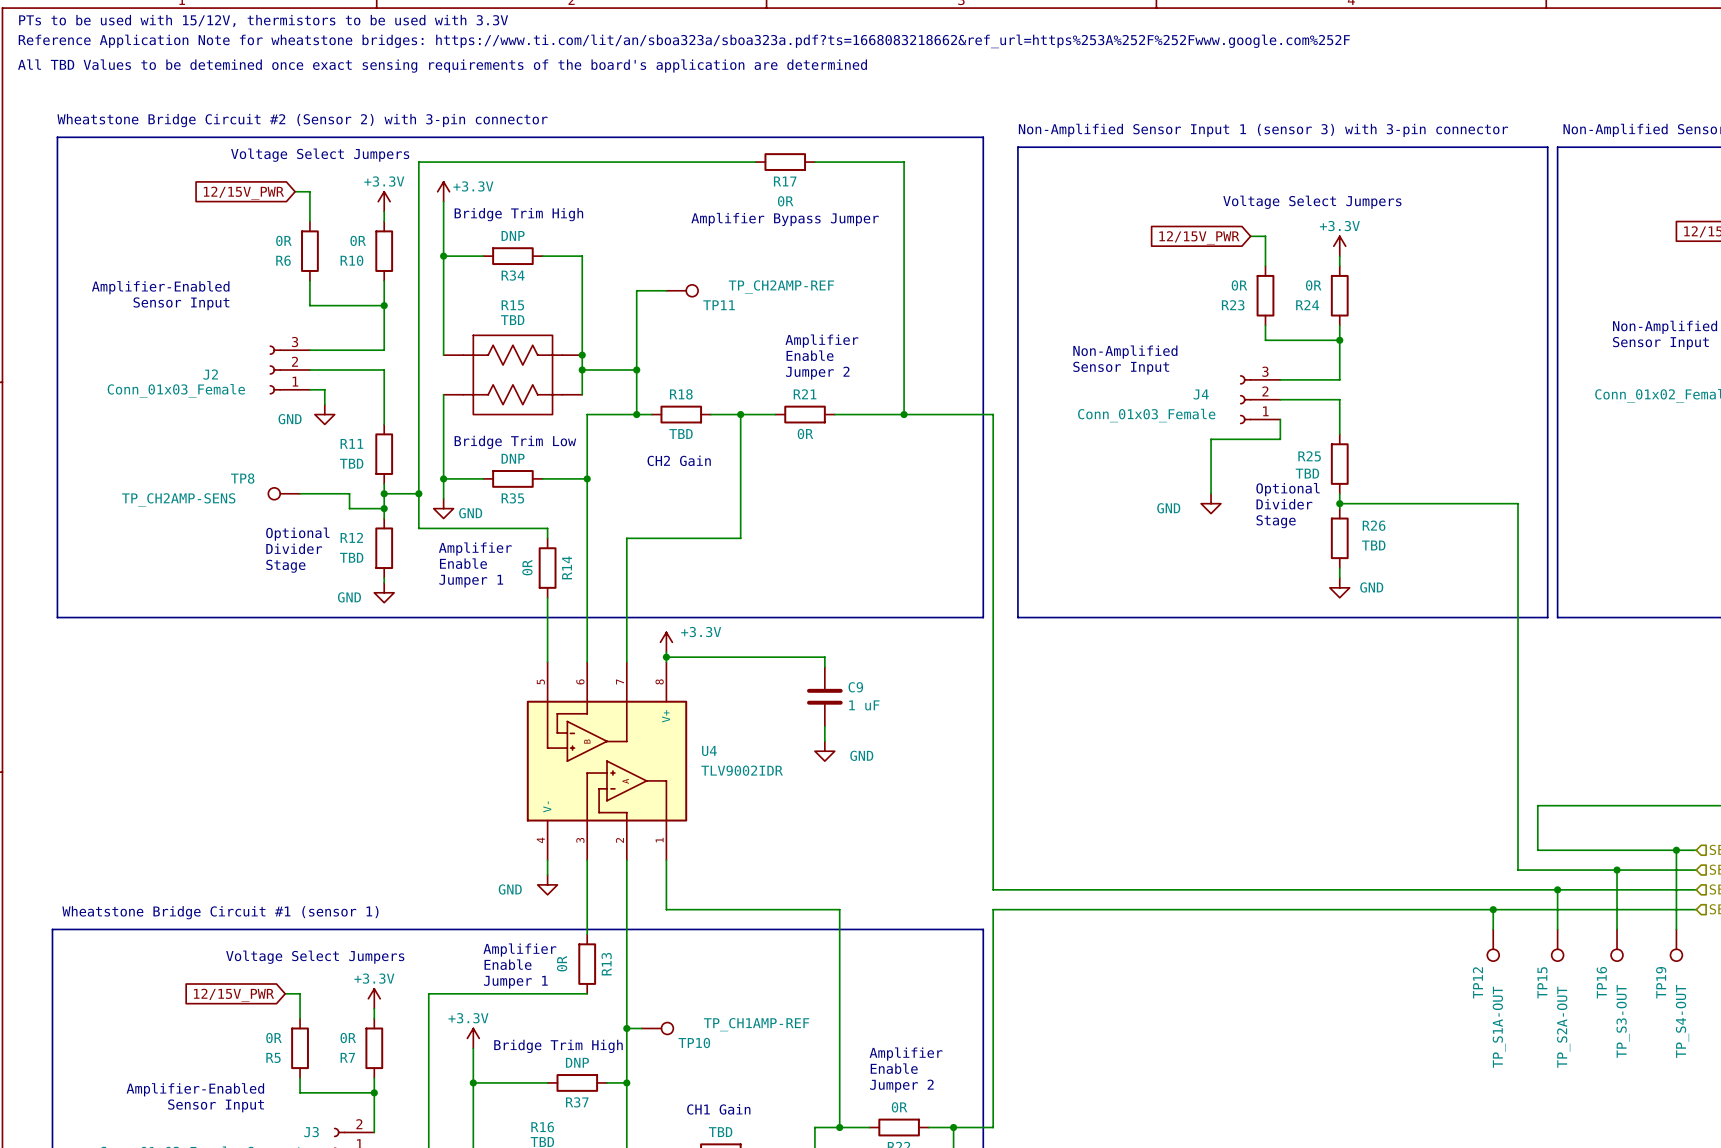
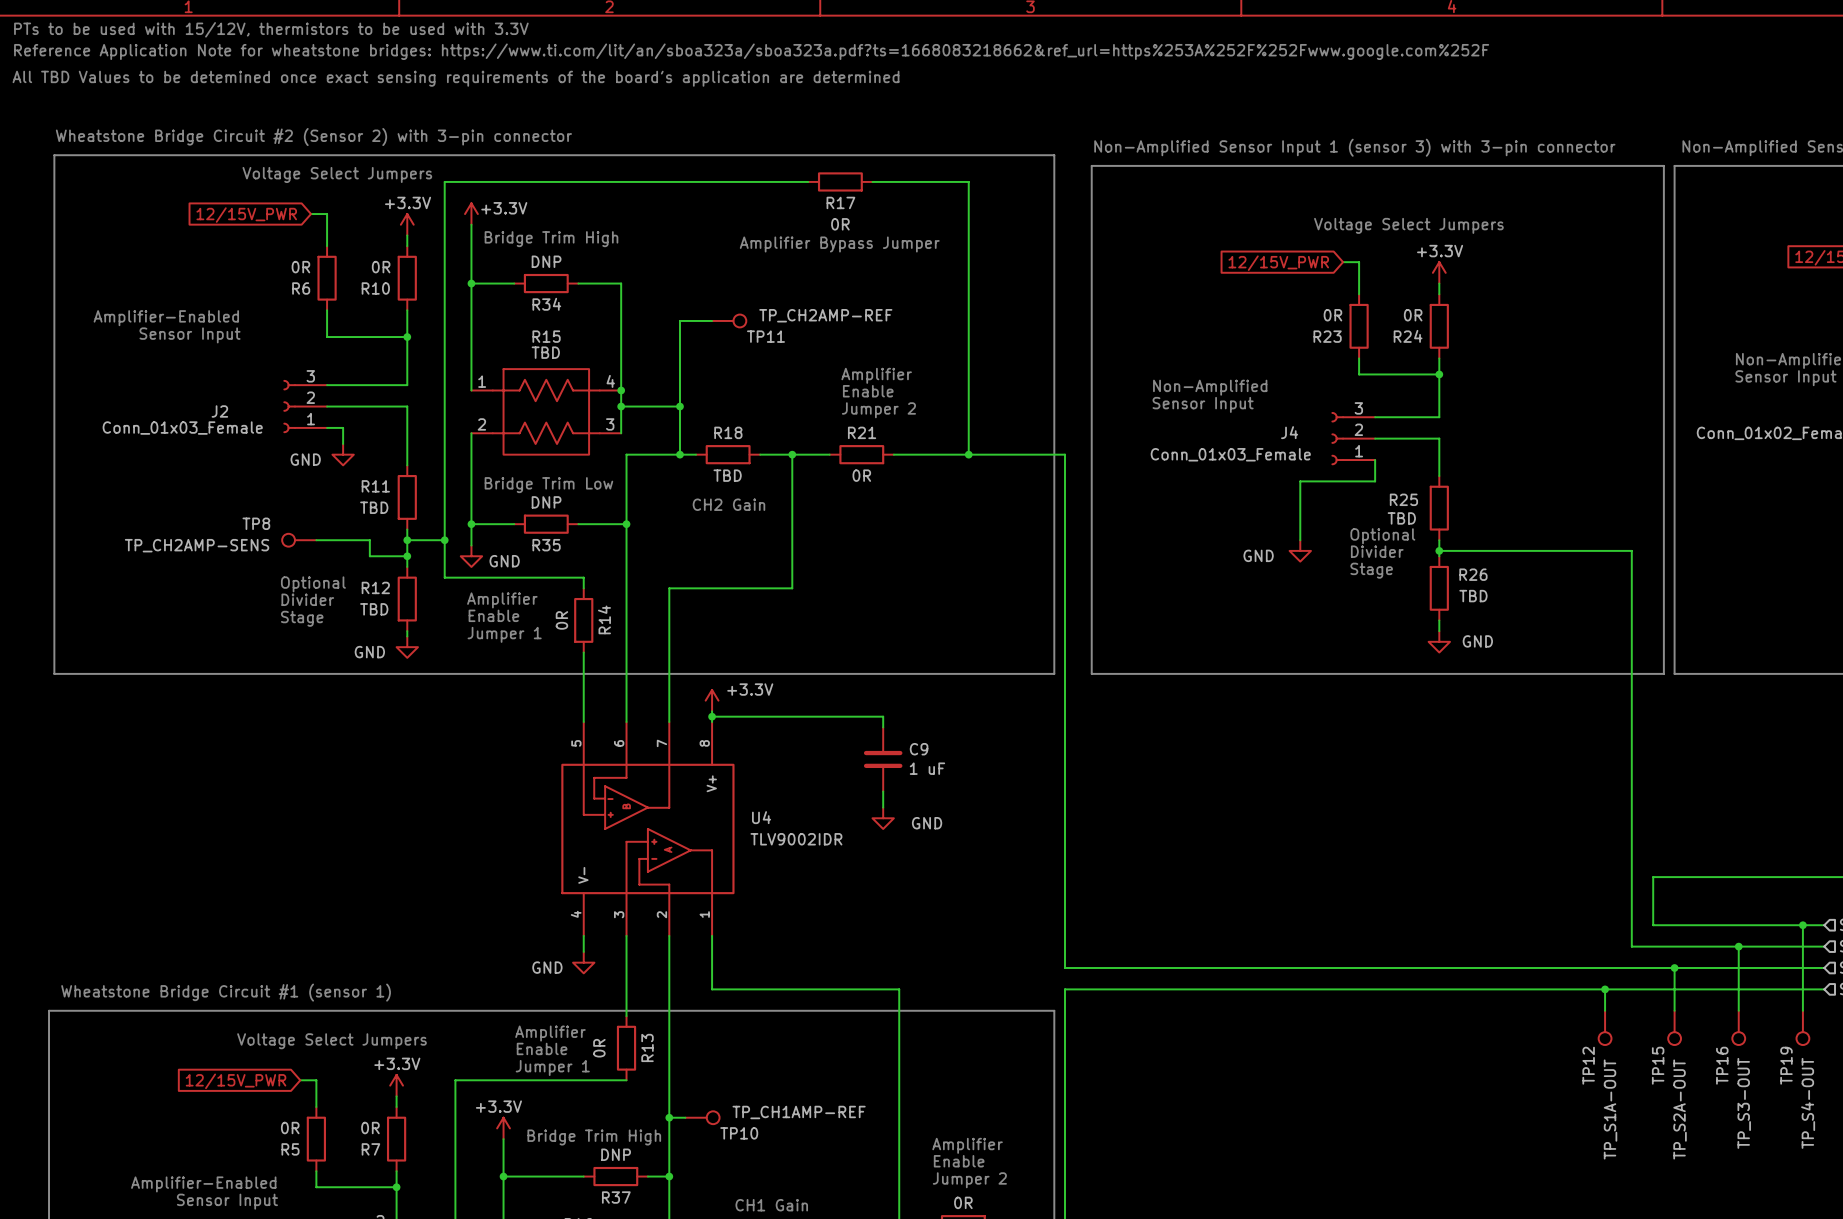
R15 pin number: none -> 1 (482, 381)
R15 pin number: none -> 4 (610, 381)
R15 pin number: none -> 2 (481, 424)
R15 pin number: none -> 3 (610, 424)

